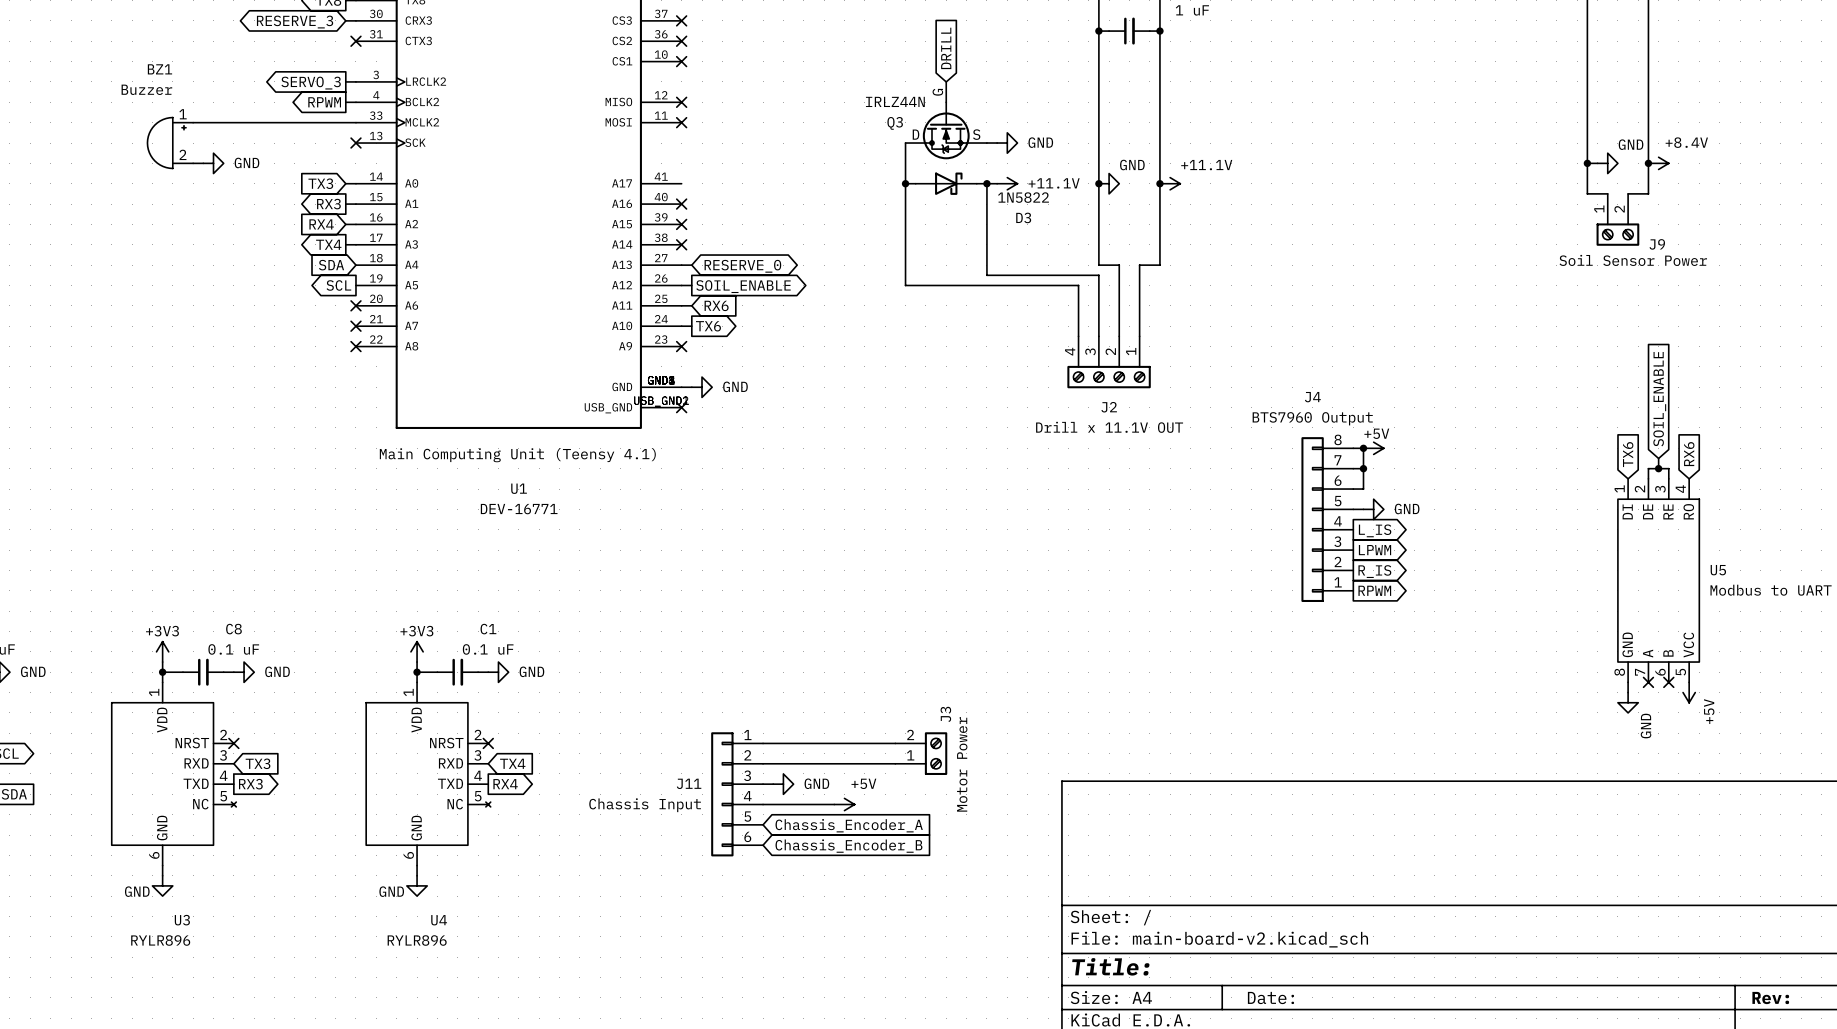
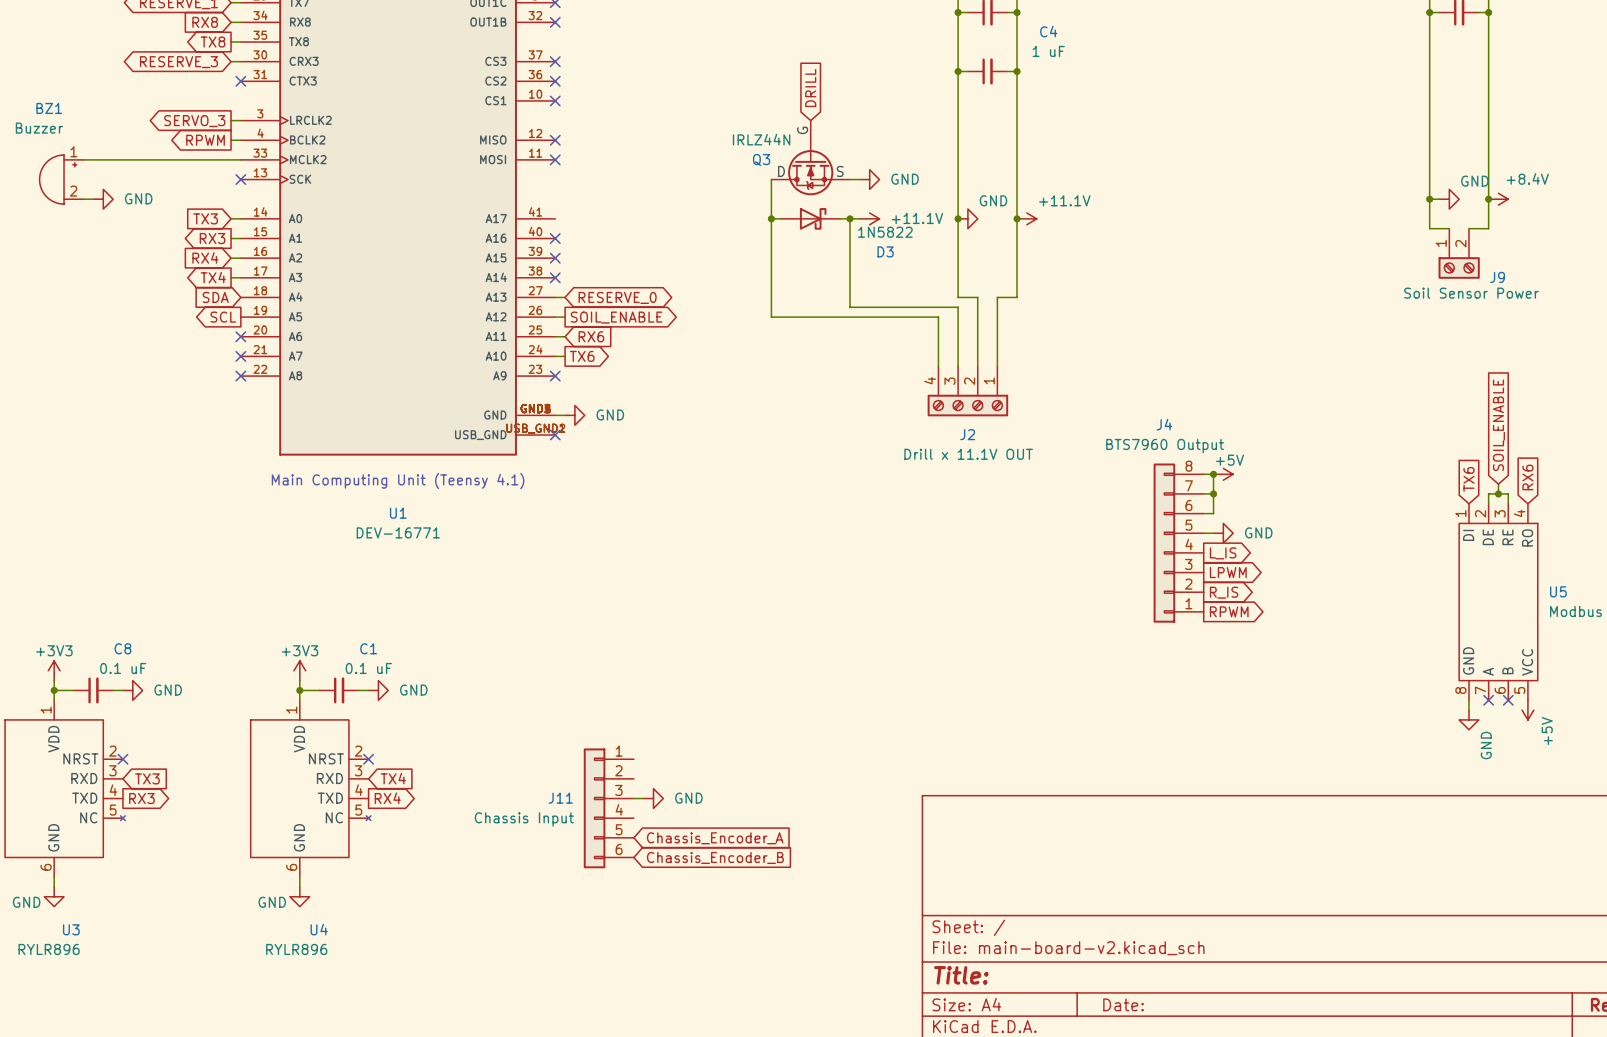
wire: (763, 743) (895, 743) -> none
J3: Motor Power (921, 753) -> none
wire: (763, 763) (895, 763) -> none
wire: (763, 804) (834, 804) -> none
power symbol: +5V (844, 804) -> none

